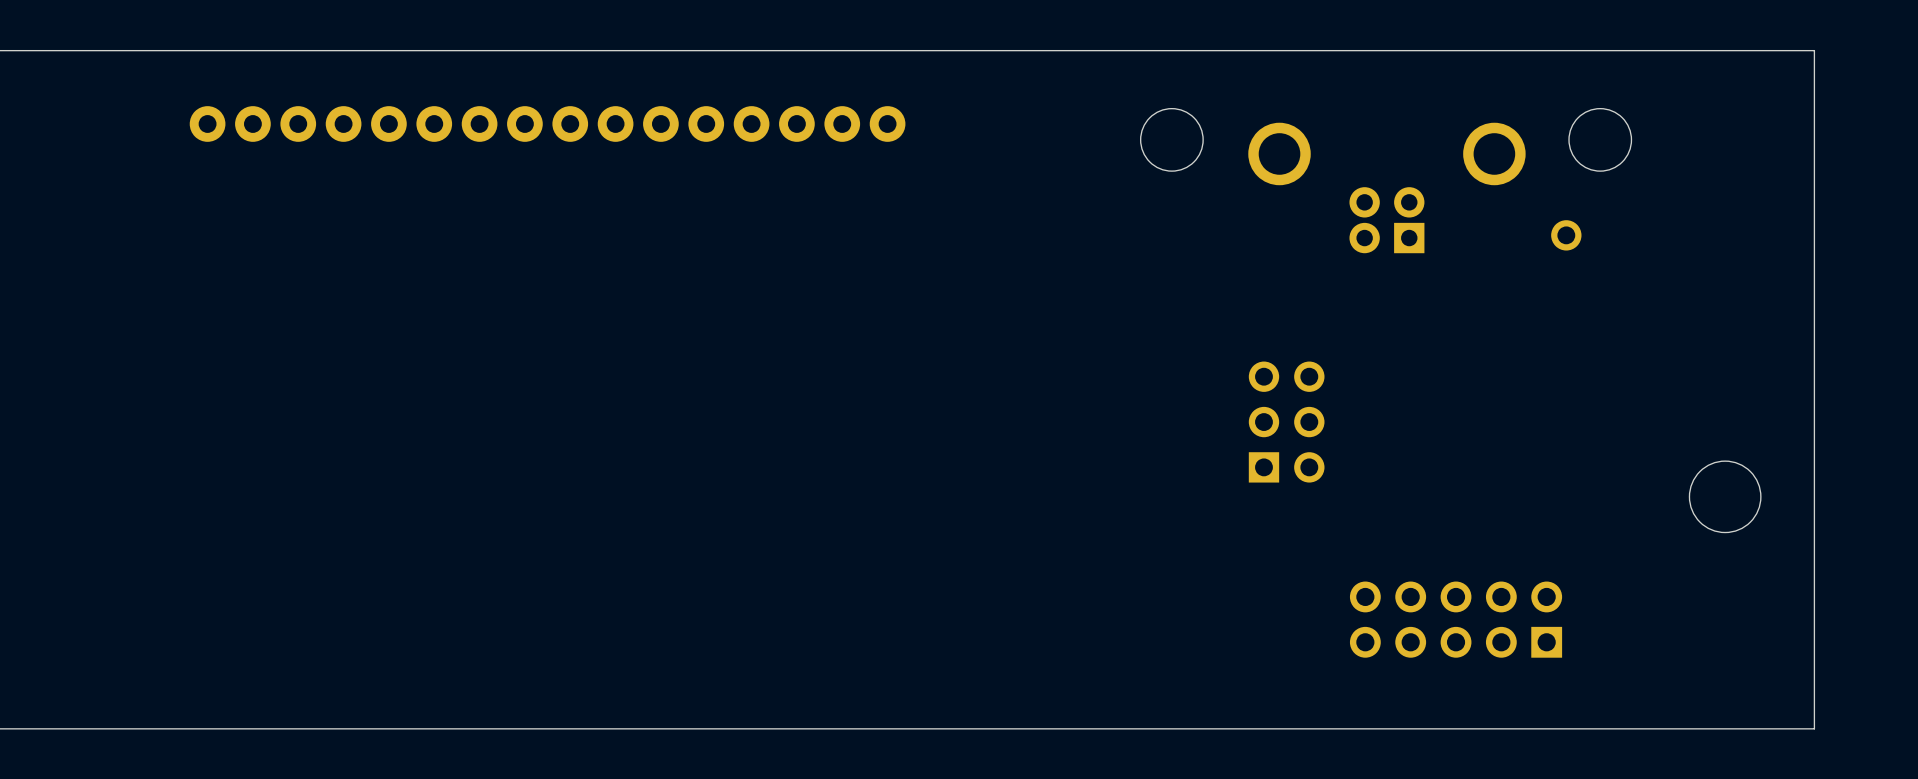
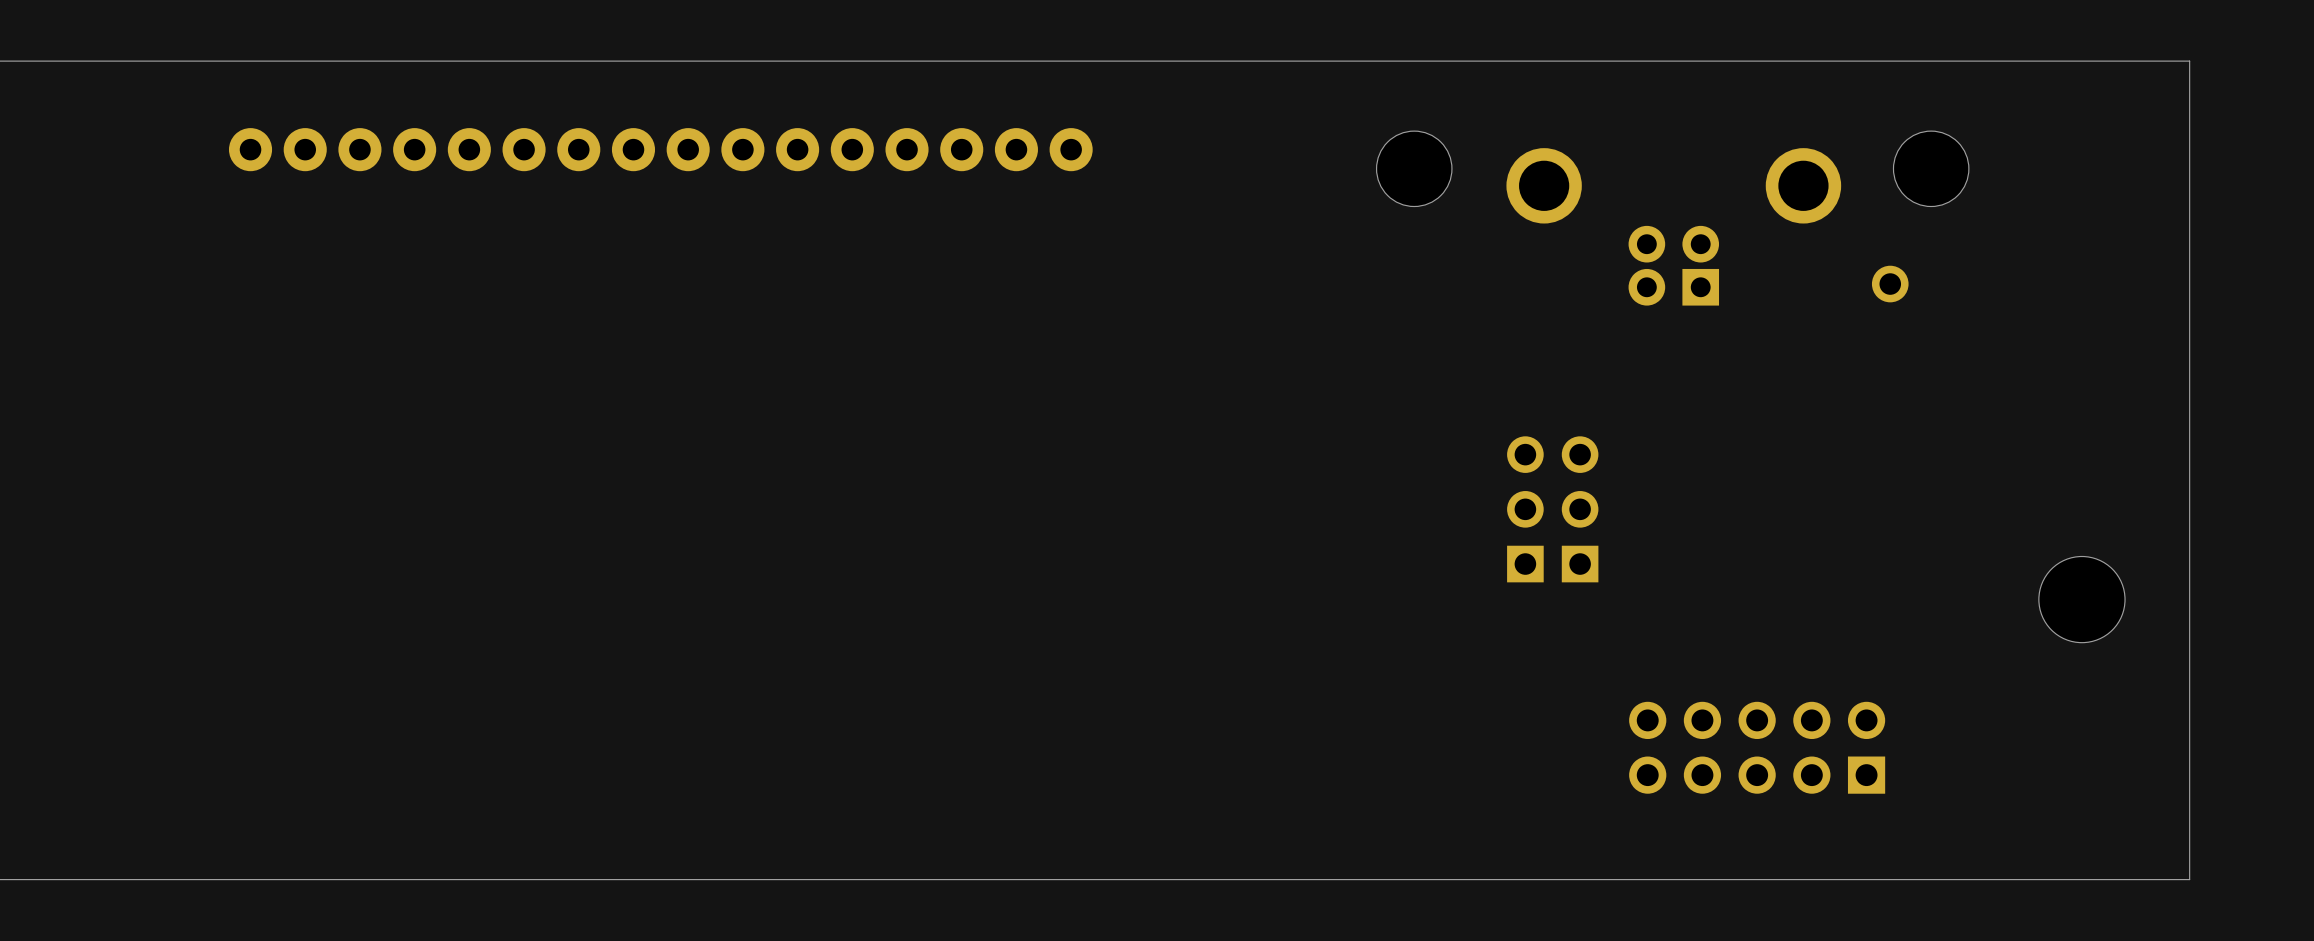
part footprint: [1248, 361, 1325, 483] -> [1507, 436, 1599, 583]

